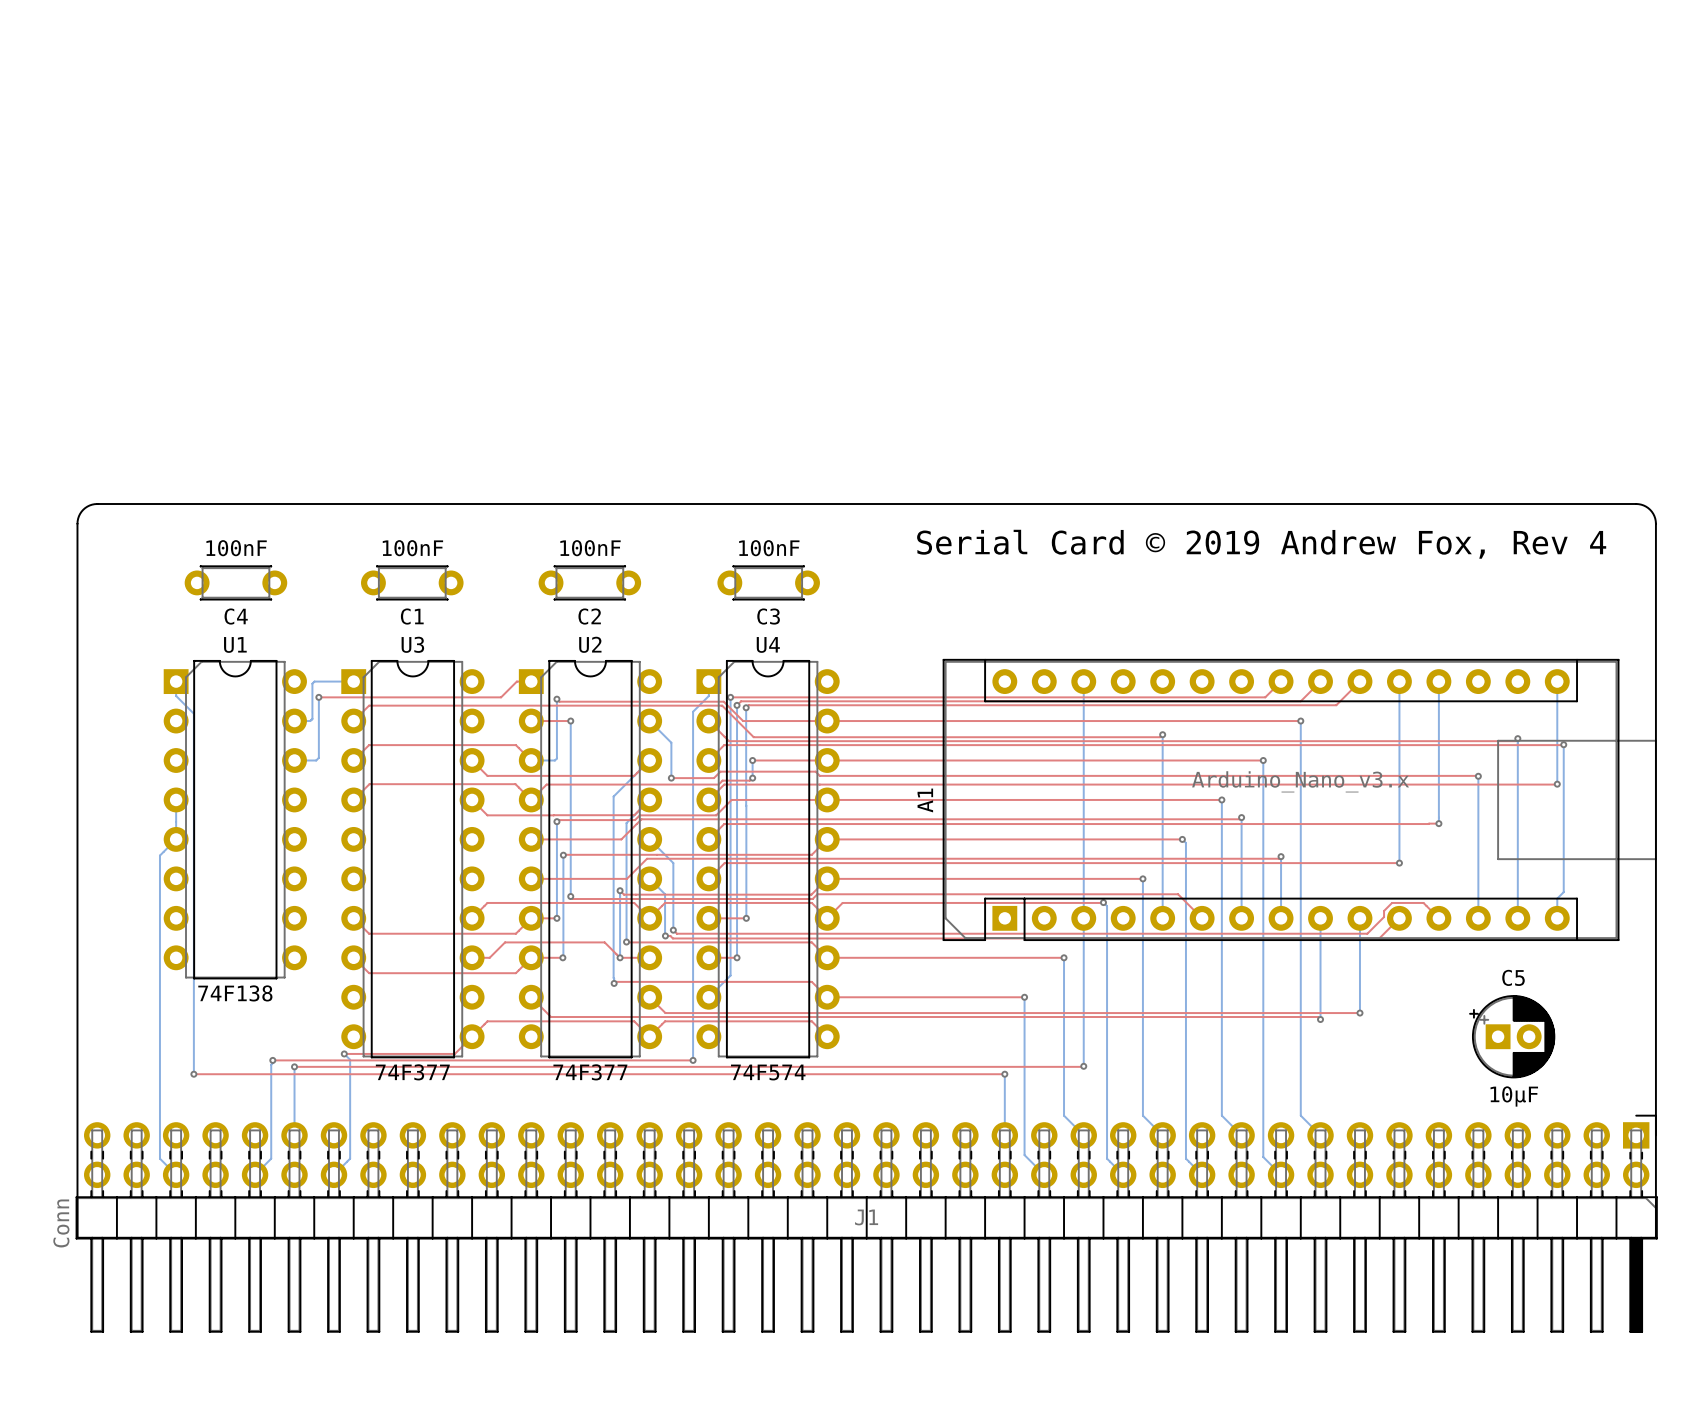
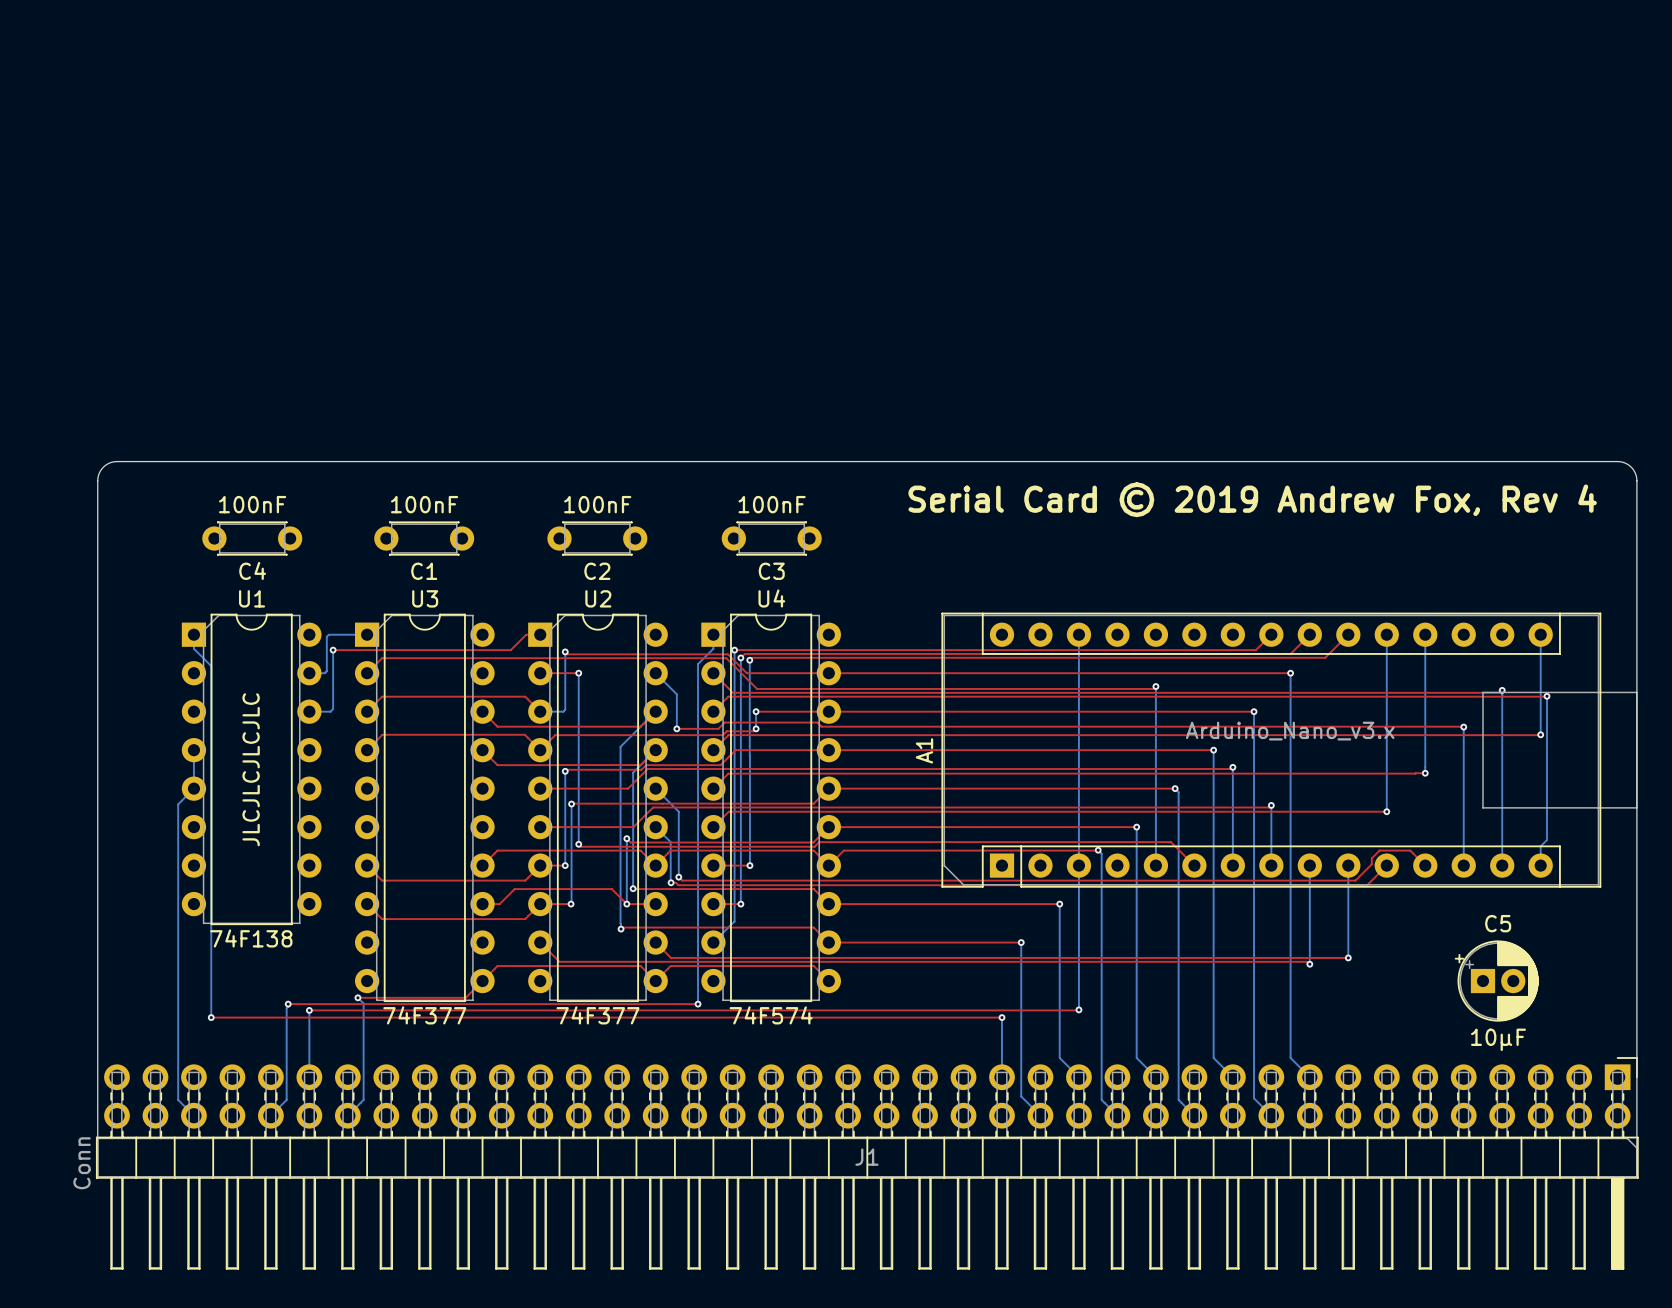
text: none -> JLCJLCJLCJLC (251, 769)

